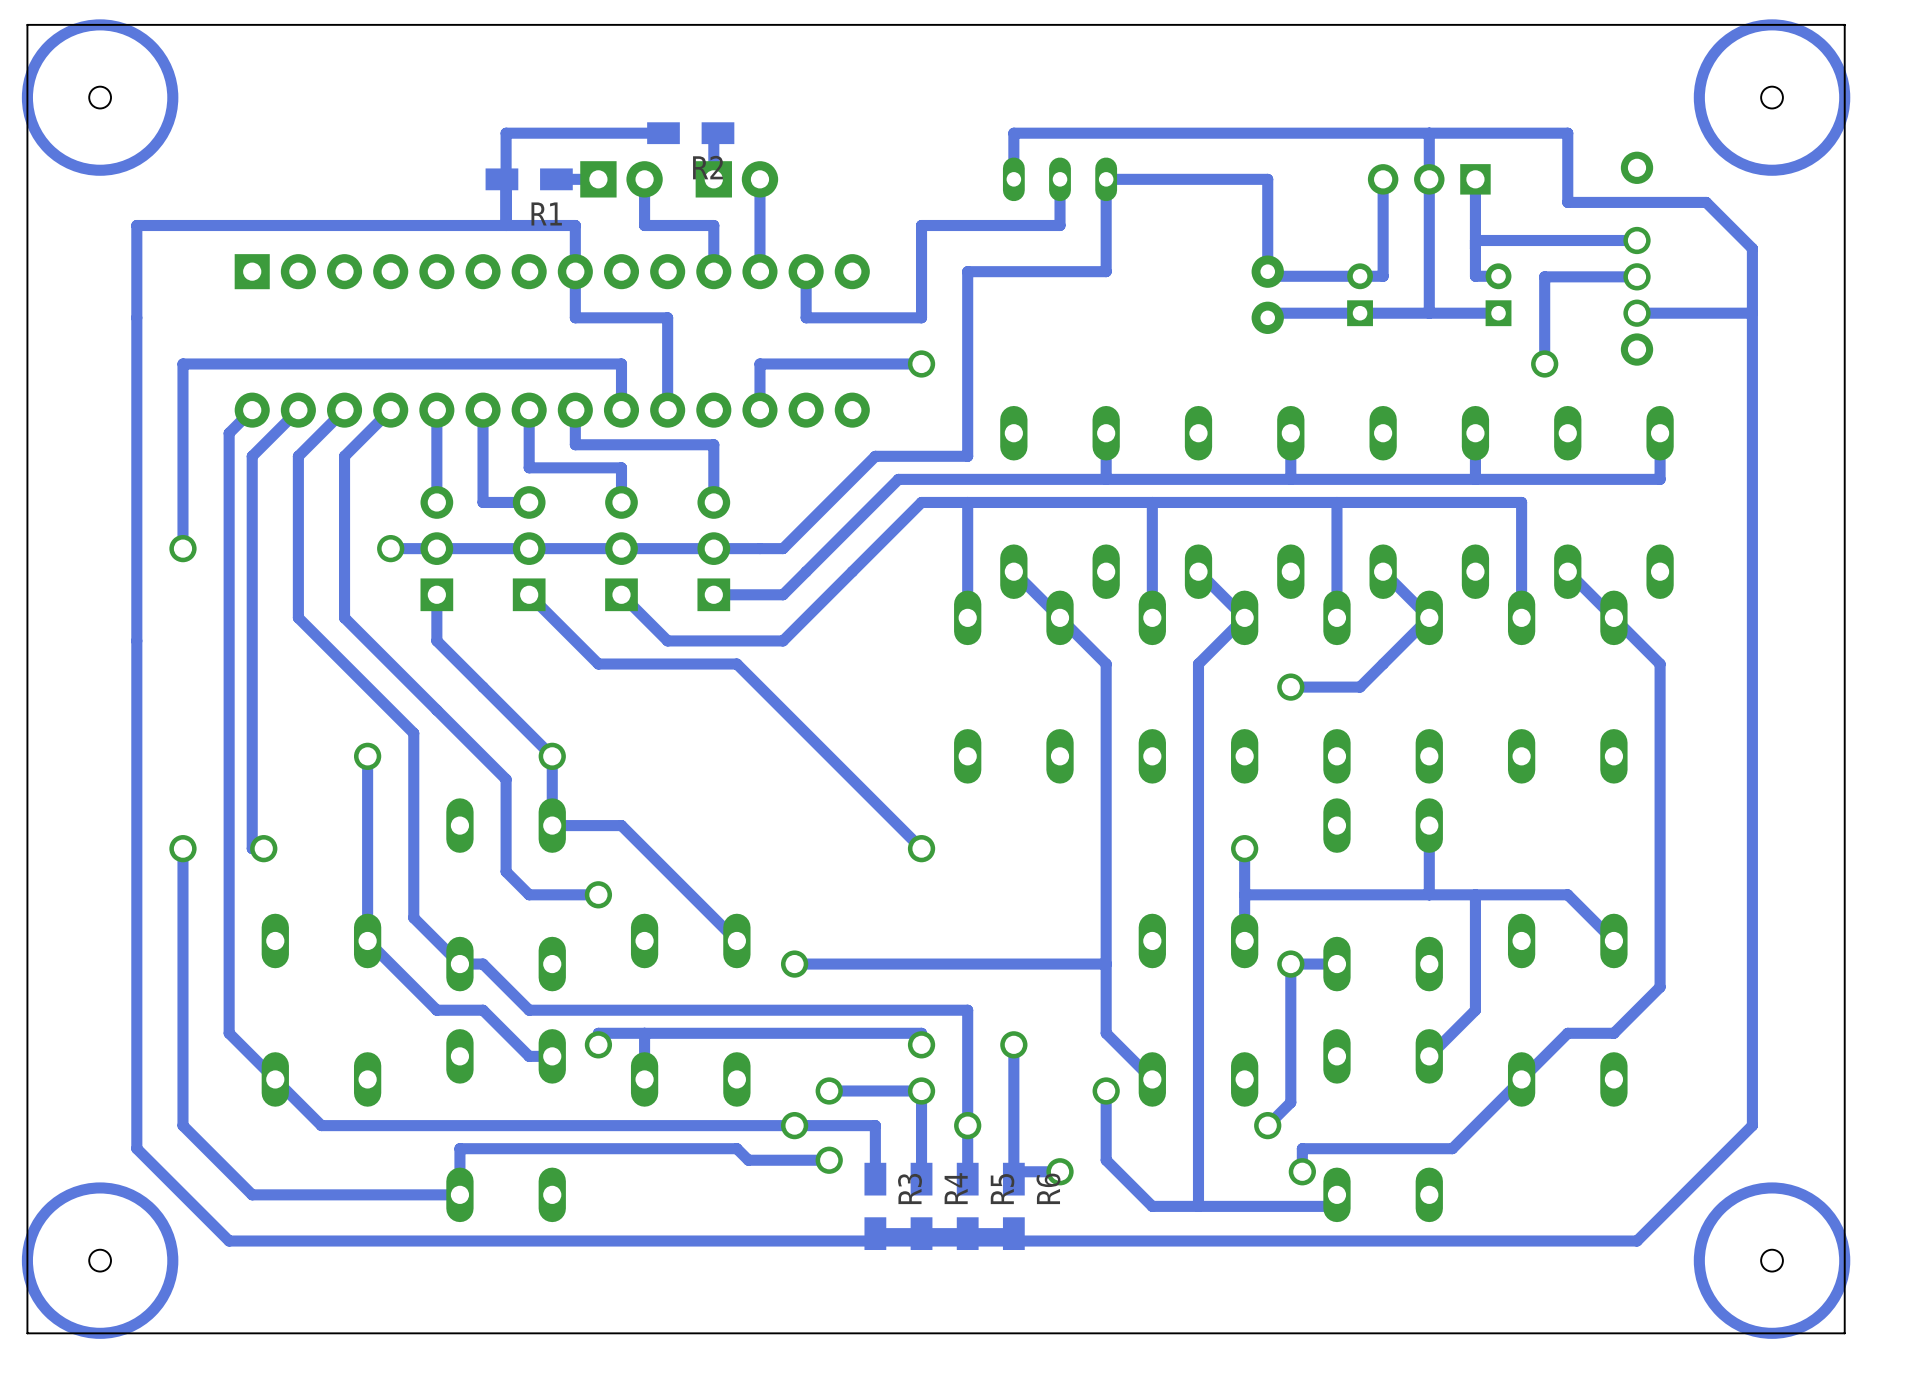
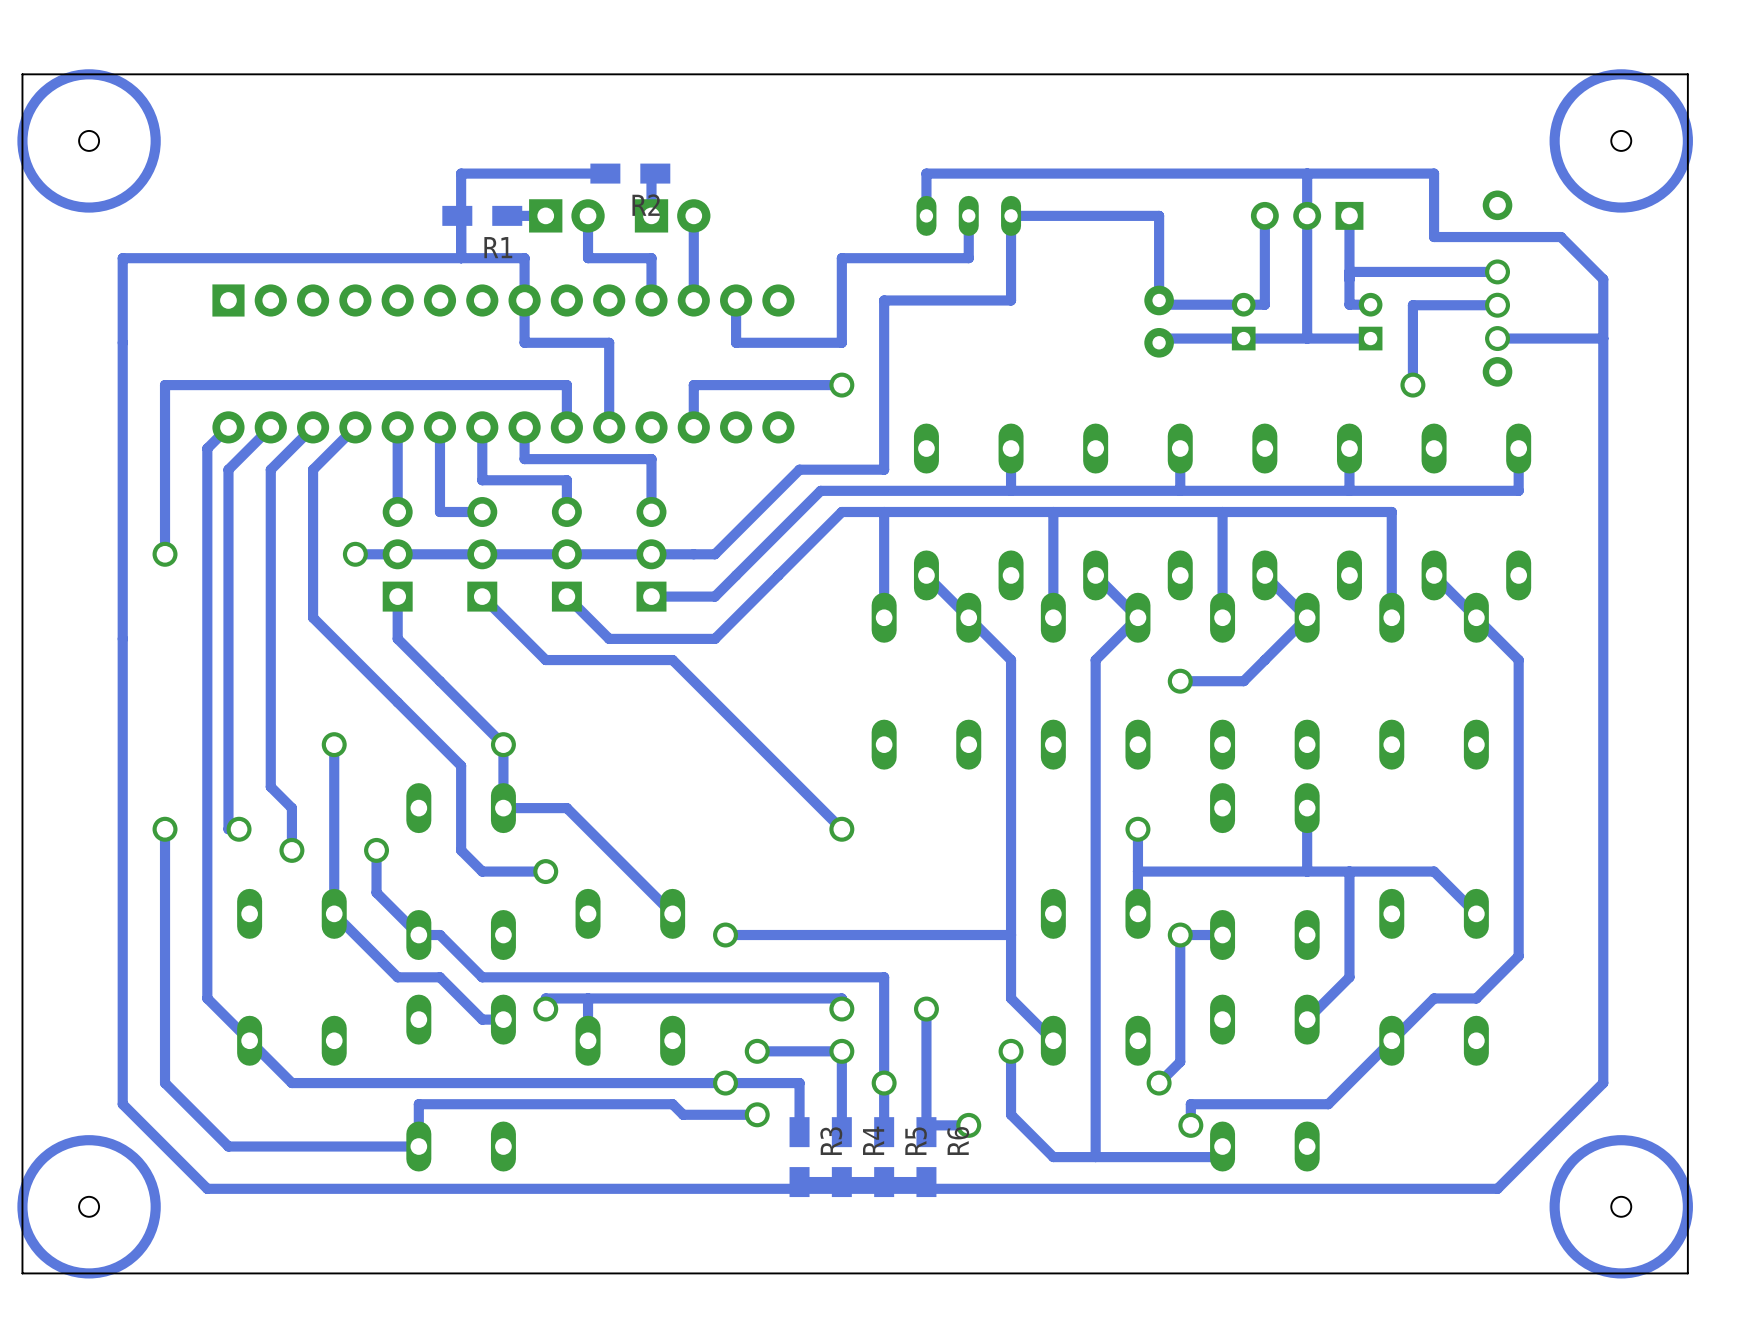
track: (298, 617) (413, 733) (413, 871) -> (270, 617) (270, 786) (291, 808) (291, 850)
via: none -> (291, 850)
via: none -> (376, 850)

